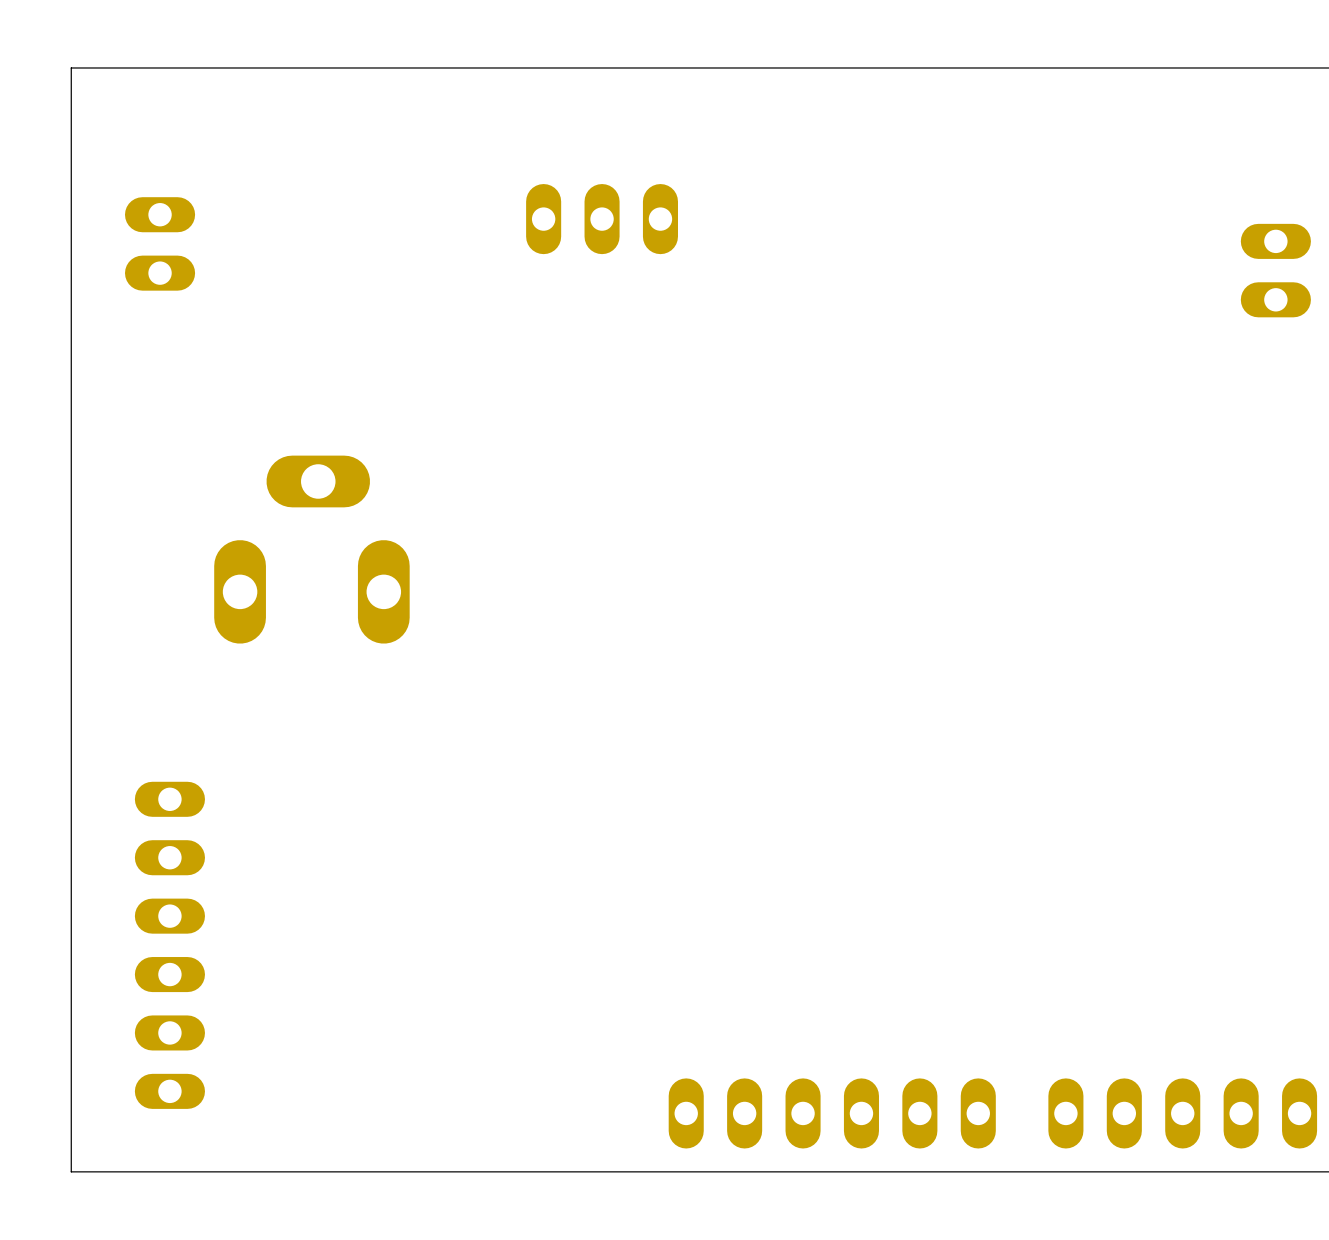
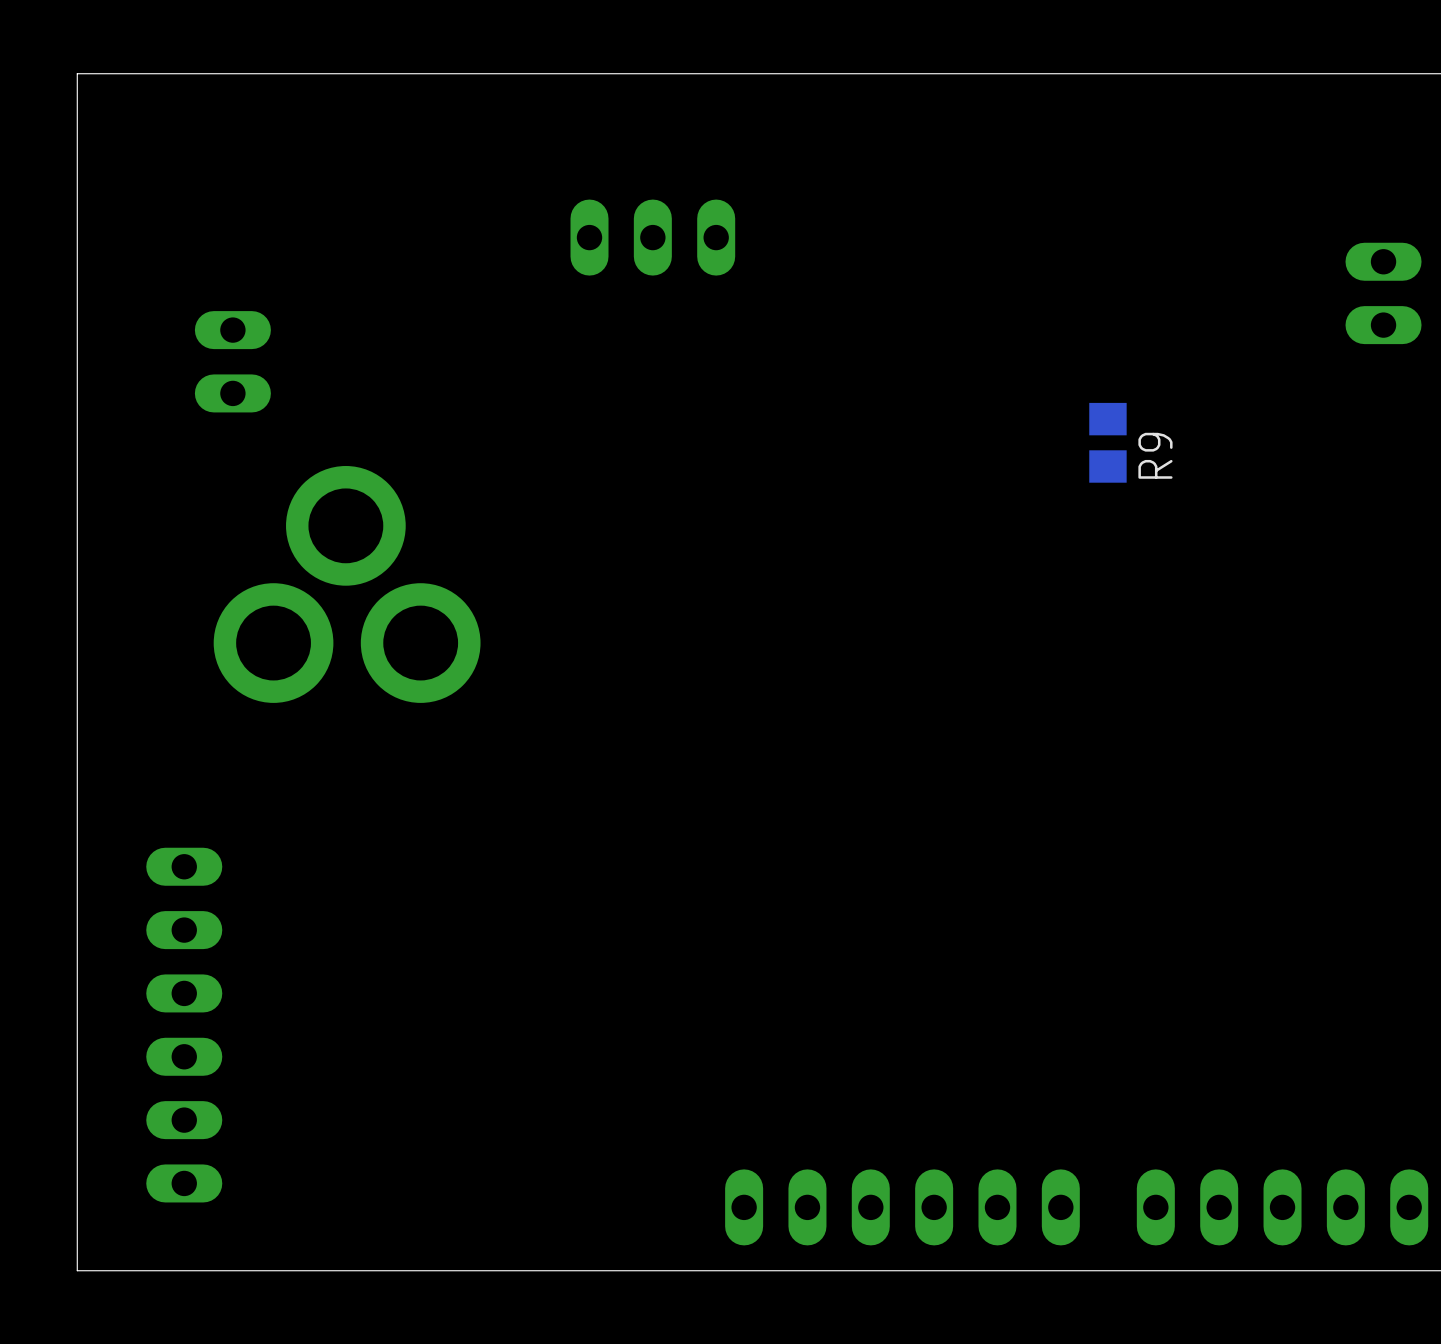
part position: (160, 243) -> (232, 361)
R9: none -> (1107, 442)
part footprint: [214, 455, 410, 644] -> [213, 466, 481, 703]

